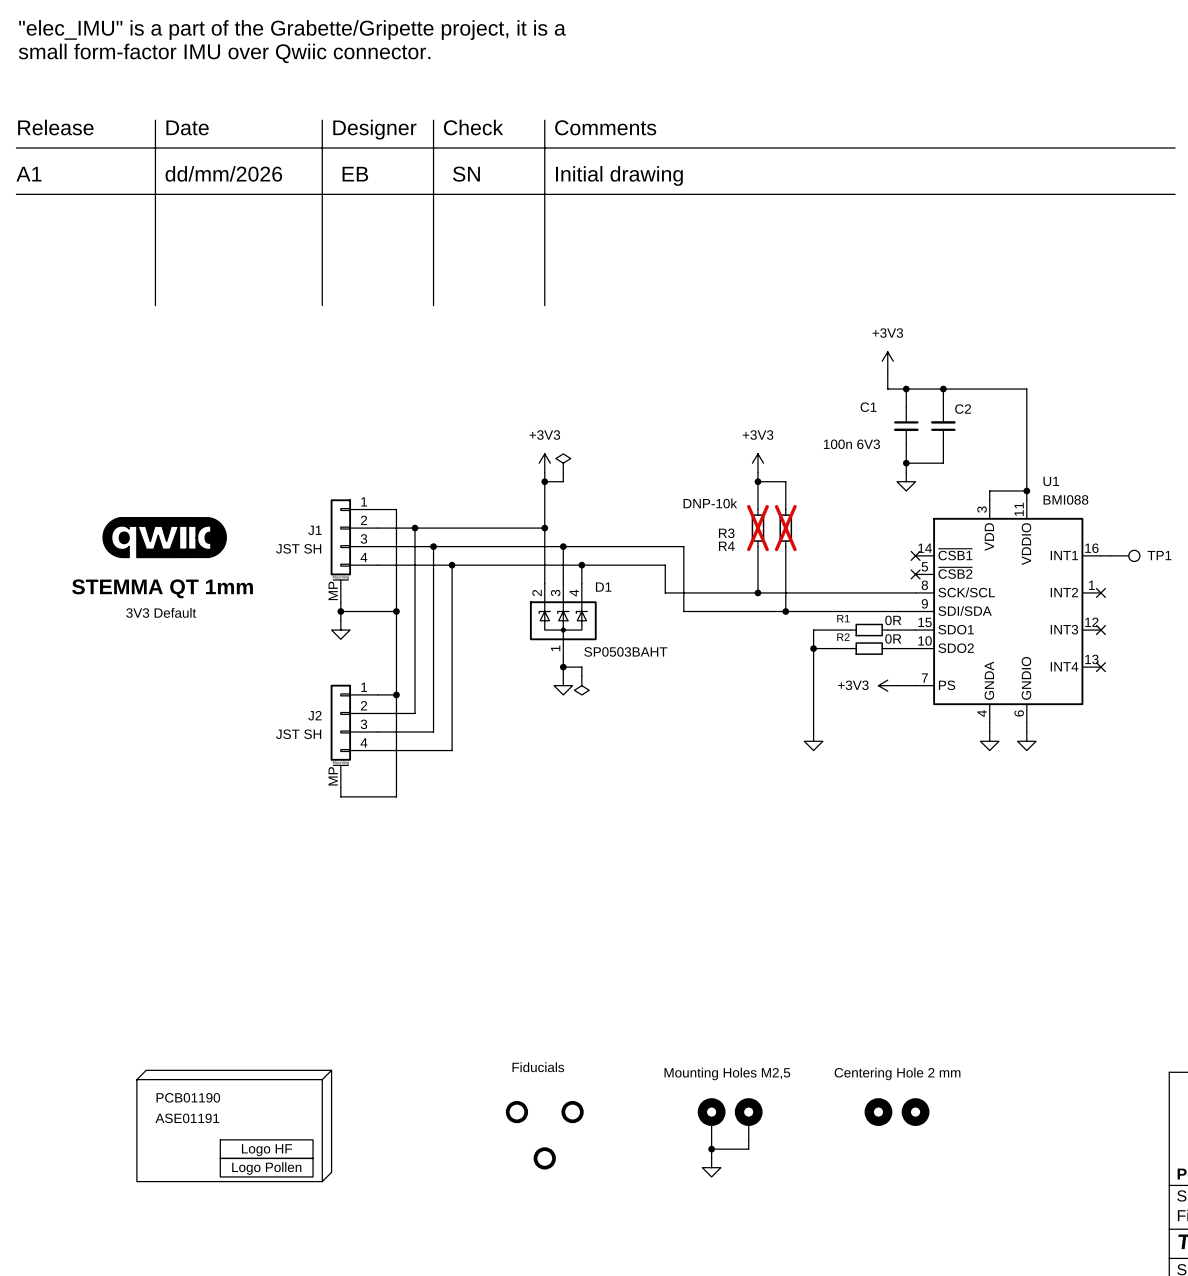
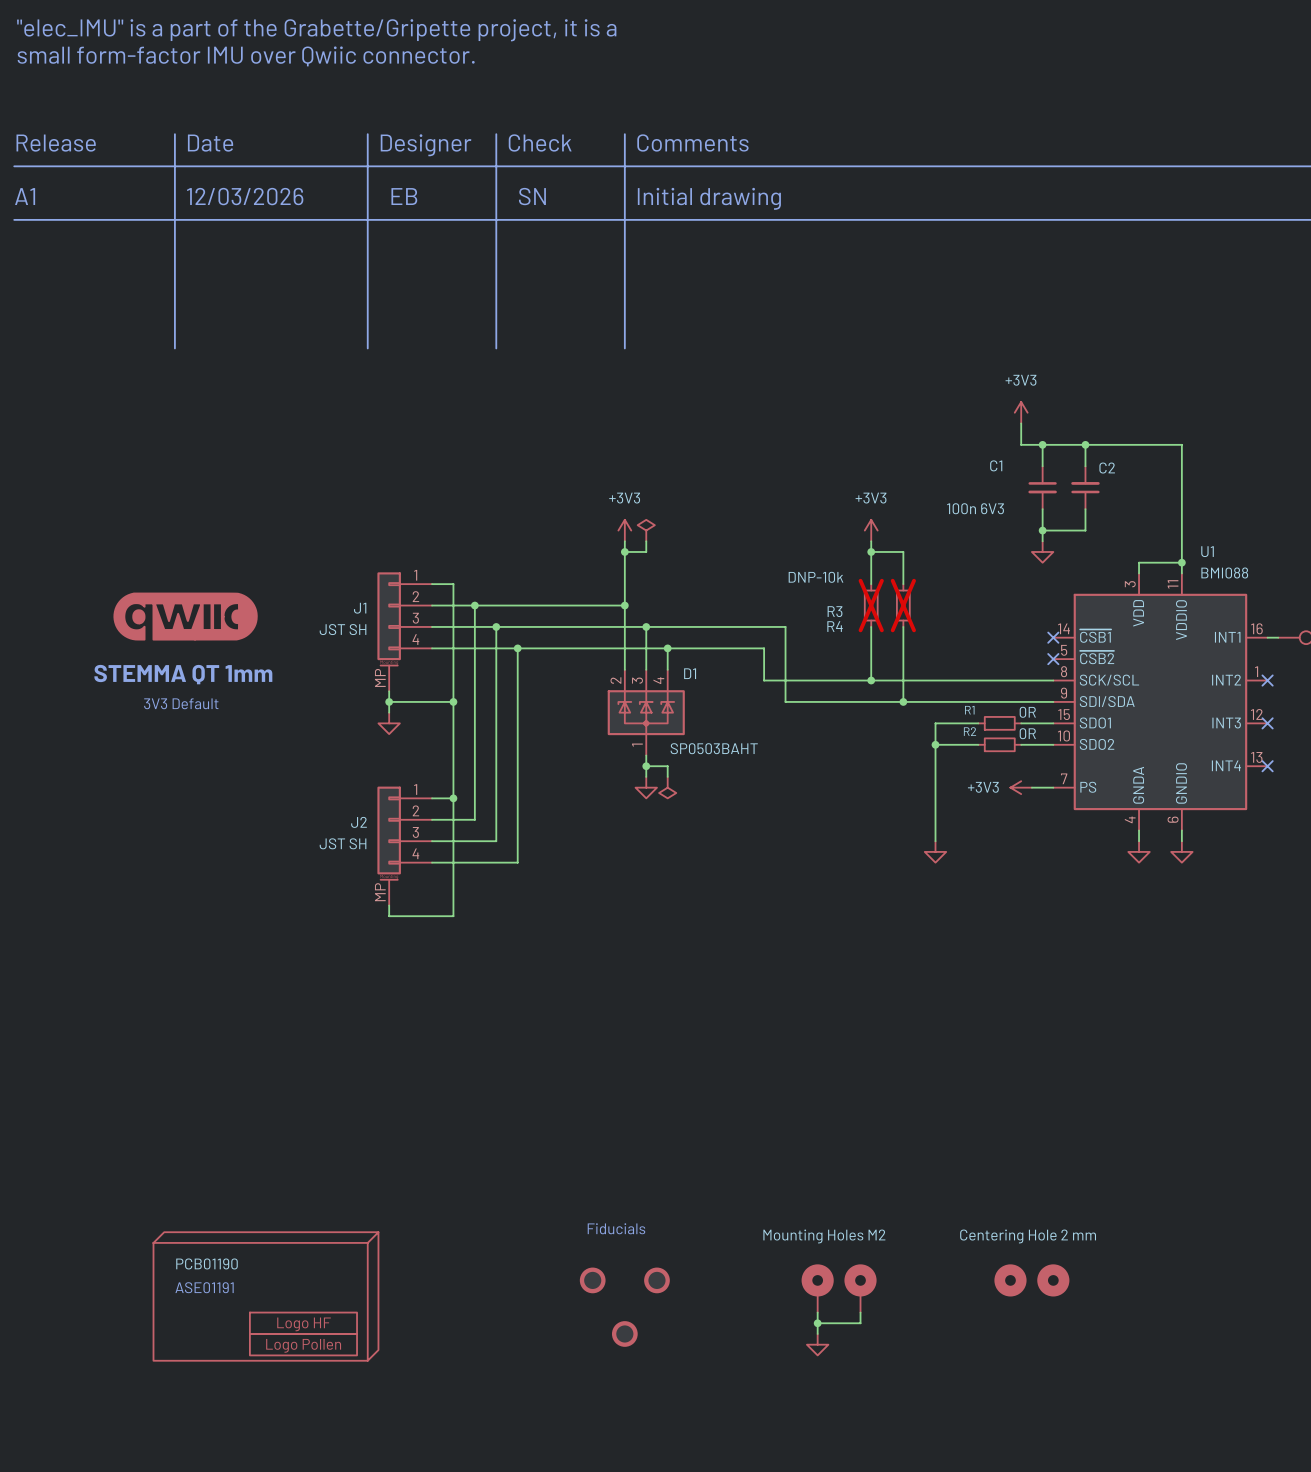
text: dd/mm/2026 (223, 173) -> 12/03/2026 (245, 196)
part value: Mounting Holes M2,5 (727, 1073) -> Mounting Holes M2 (824, 1236)

